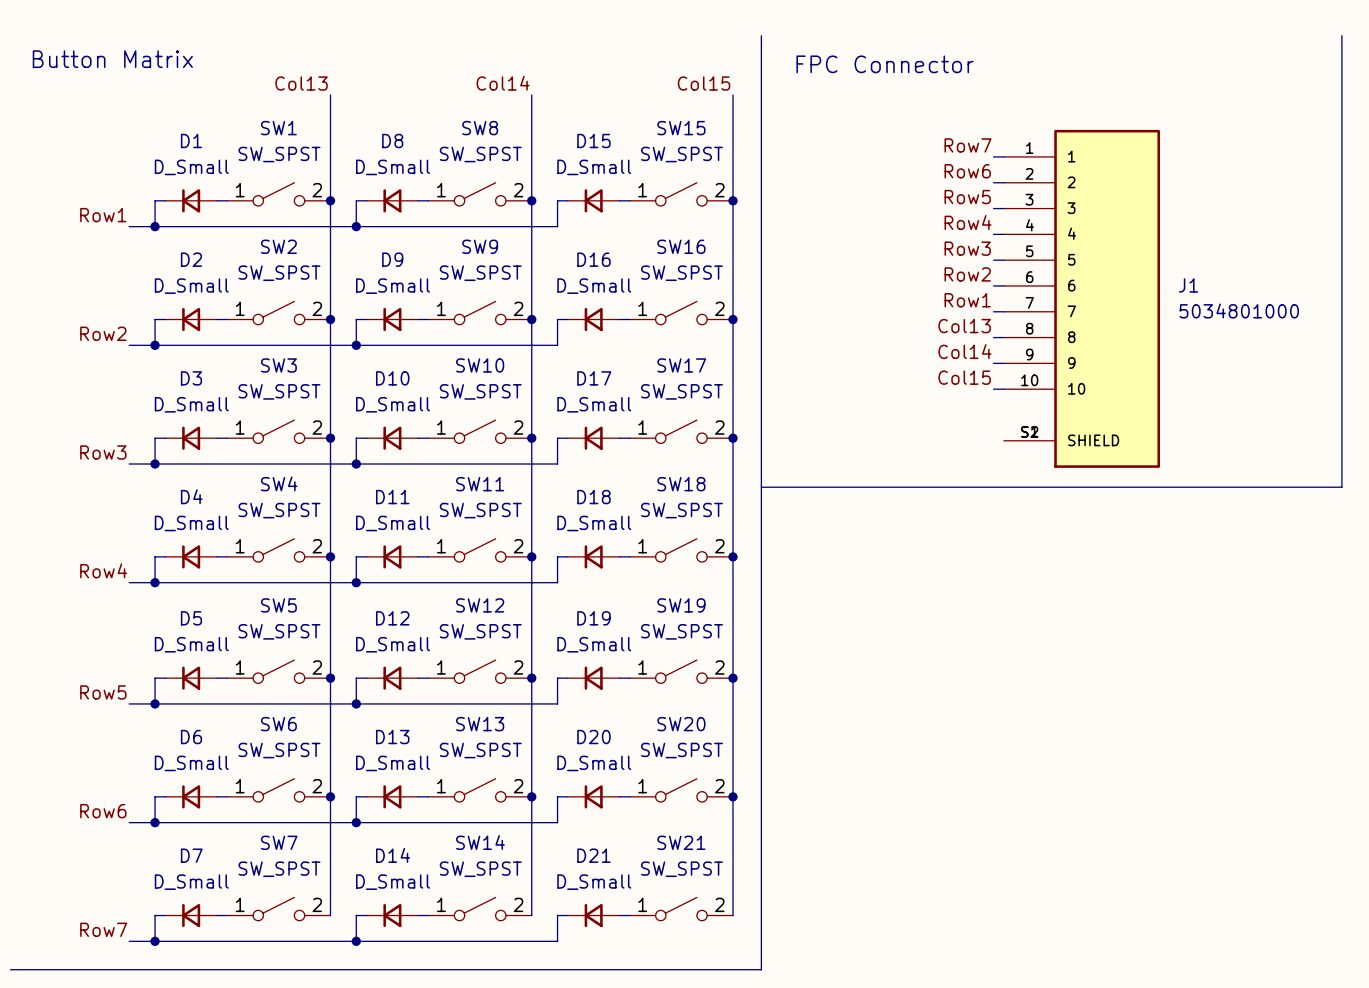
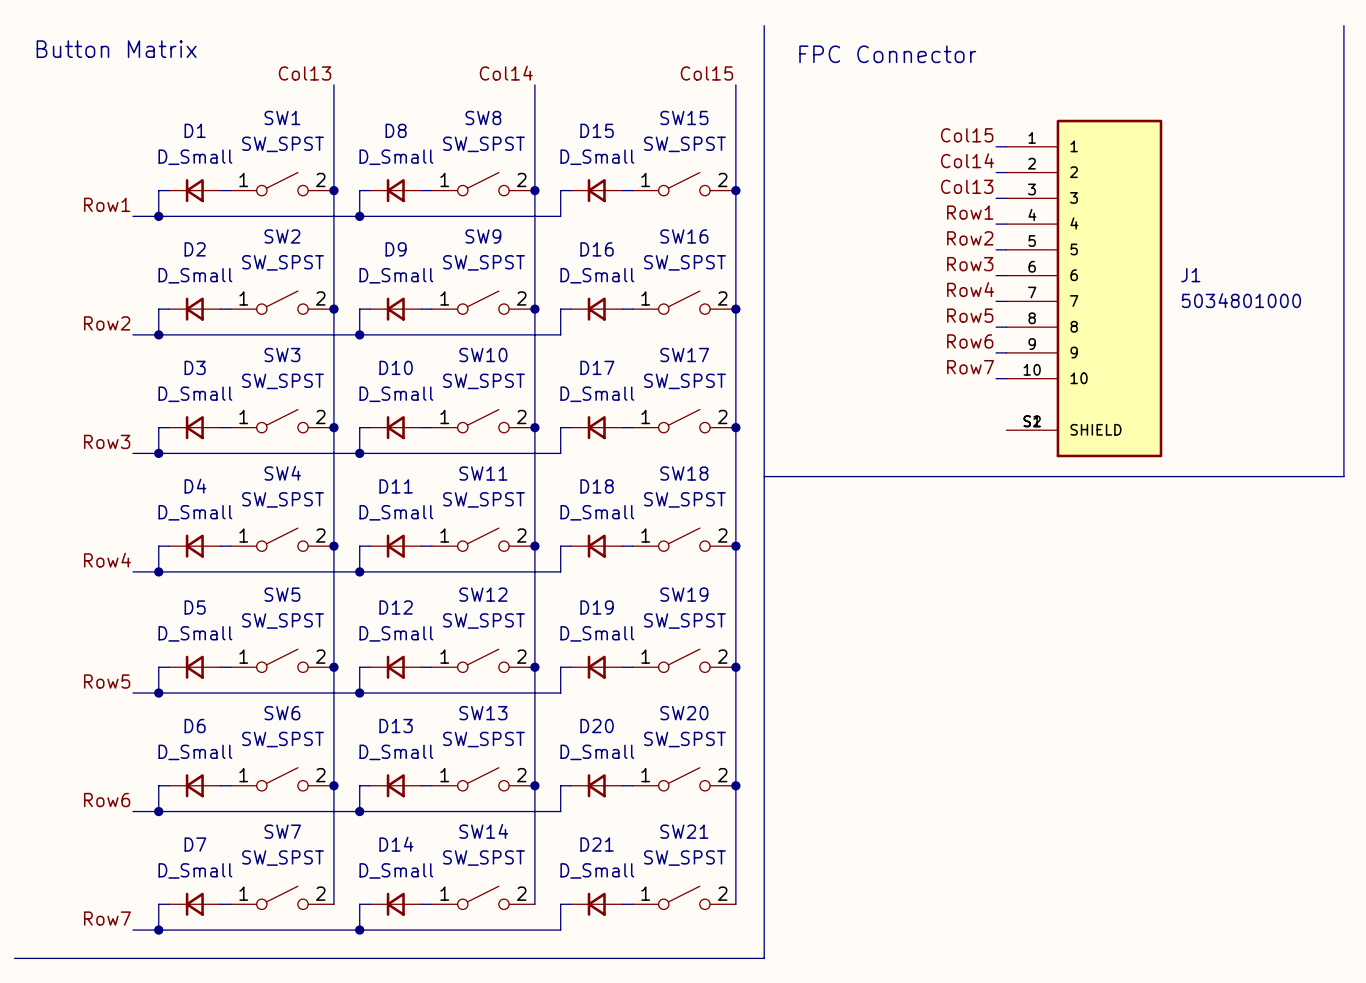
label: Row7 (968, 145) -> Col15 (967, 135)
label: Row6 (967, 171) -> Col14 (967, 160)
label: Row5 (967, 197) -> Col13 (967, 186)
label: Row4 (968, 222) -> Row1 (970, 212)
label: Row3 (967, 248) -> Row2 (970, 238)
label: Row2 (967, 274) -> Row3 (970, 264)
label: Row1 (967, 300) -> Row4 (970, 289)
label: Col13 (964, 326) -> Row5 (970, 315)
label: Col14 (964, 351) -> Row6 (970, 341)
label: Col15 (964, 377) -> Row7 (970, 367)

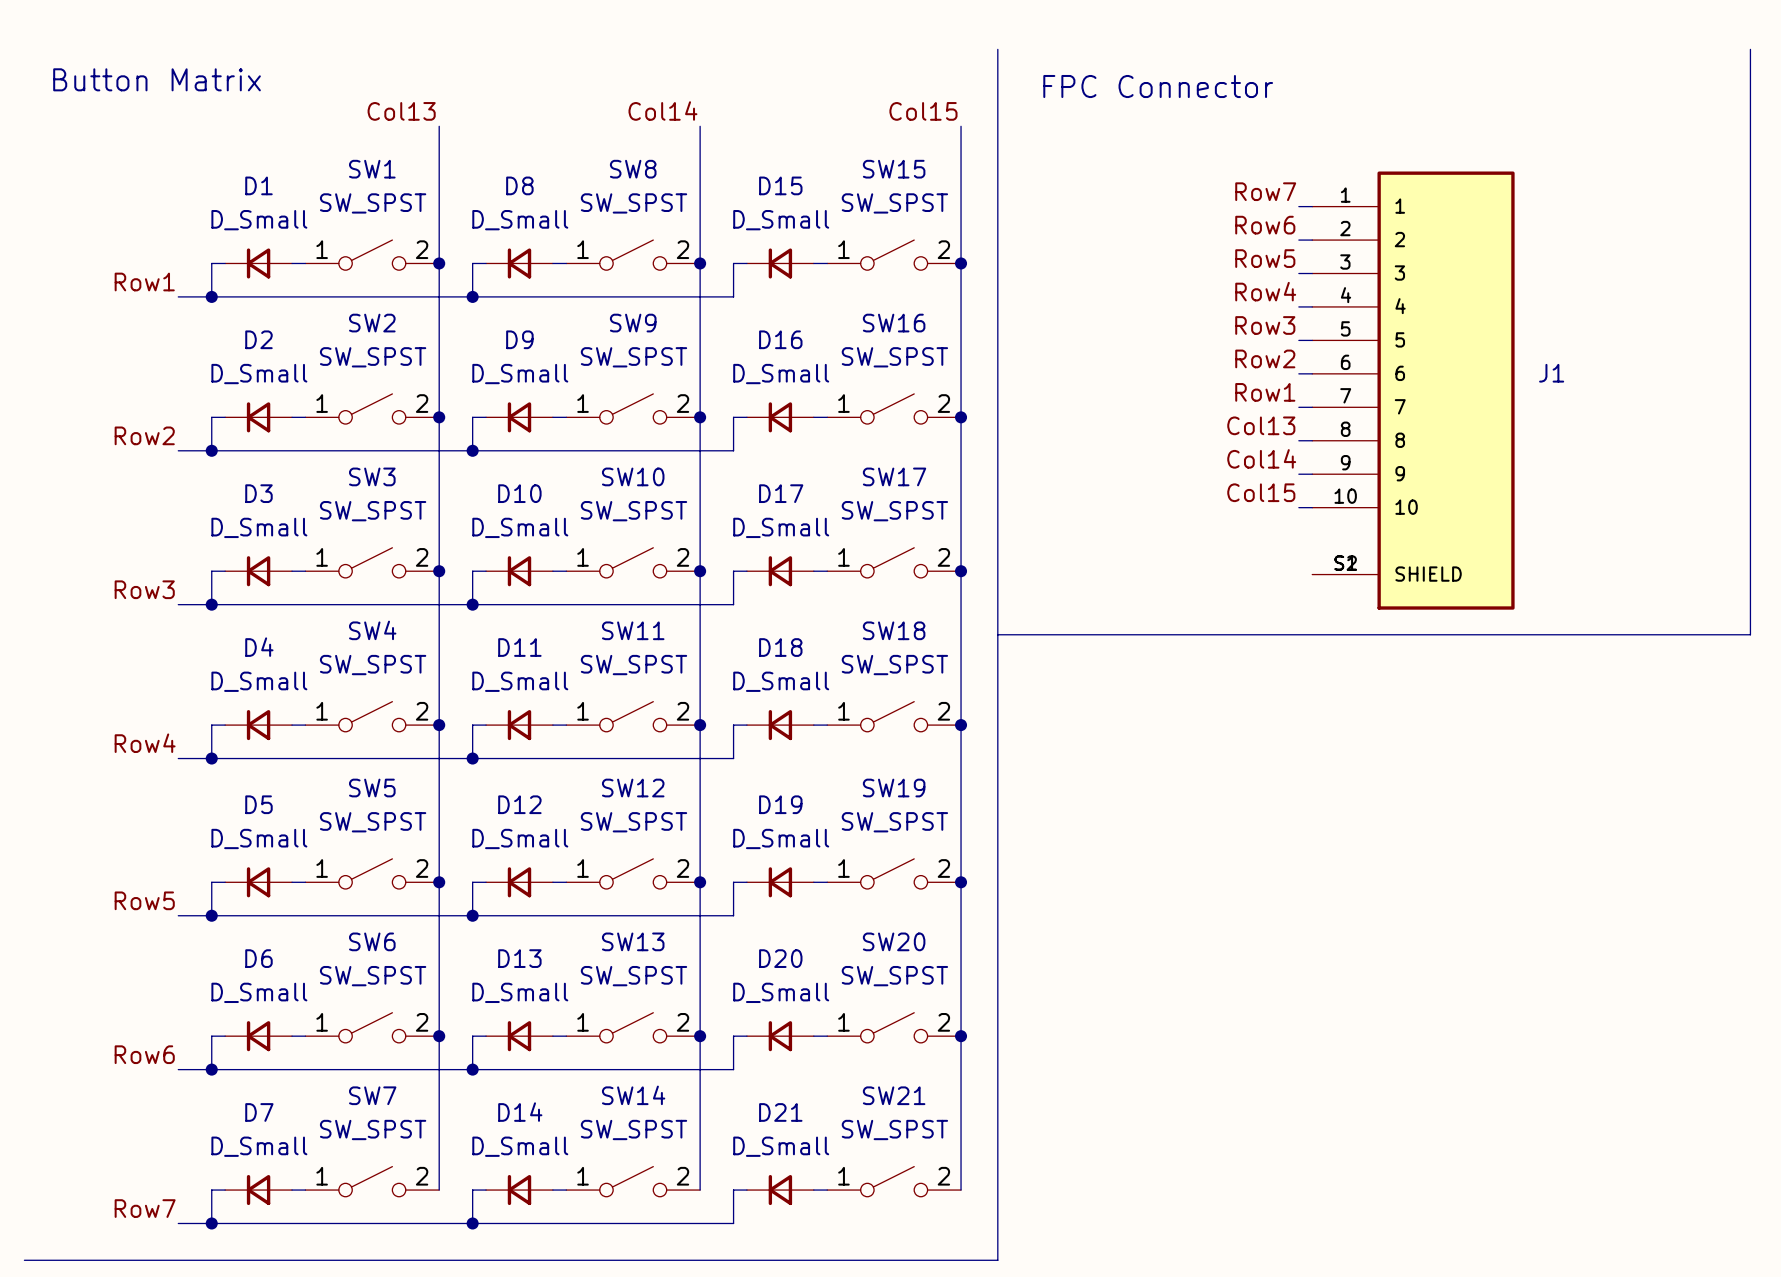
label: Col15 (967, 135) -> Row7 (1265, 191)
label: Col14 (967, 160) -> Row6 (1265, 225)
label: Col13 (967, 186) -> Row5 (1265, 258)
label: Row1 (970, 212) -> Row4 (1265, 291)
label: Row2 (970, 238) -> Row3 (1265, 325)
label: Row3 (970, 264) -> Row2 (1265, 358)
label: Row4 (970, 289) -> Row1 (1265, 392)
J1 value: 5034801000 (1241, 300) -> none
label: Row5 (970, 315) -> Col13 (1261, 425)
label: Row6 (970, 341) -> Col14 (1261, 458)
label: Row7 (970, 367) -> Col15 (1261, 492)

